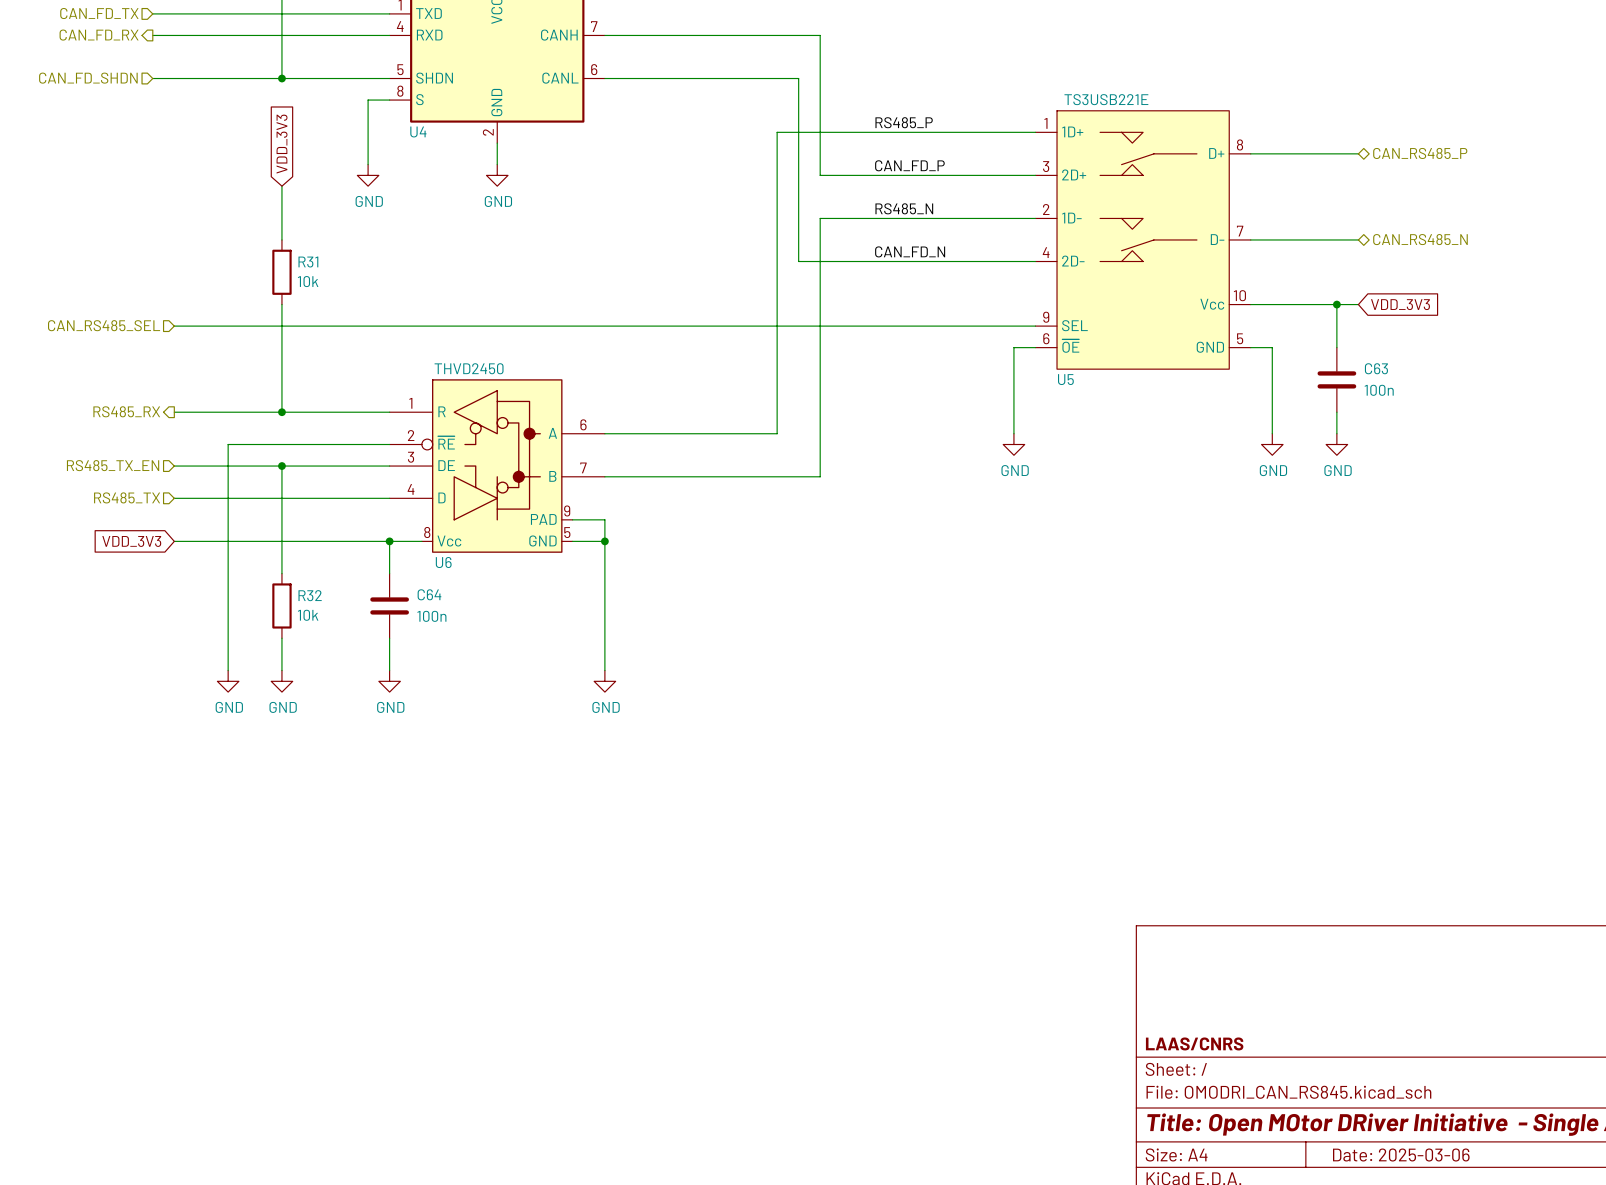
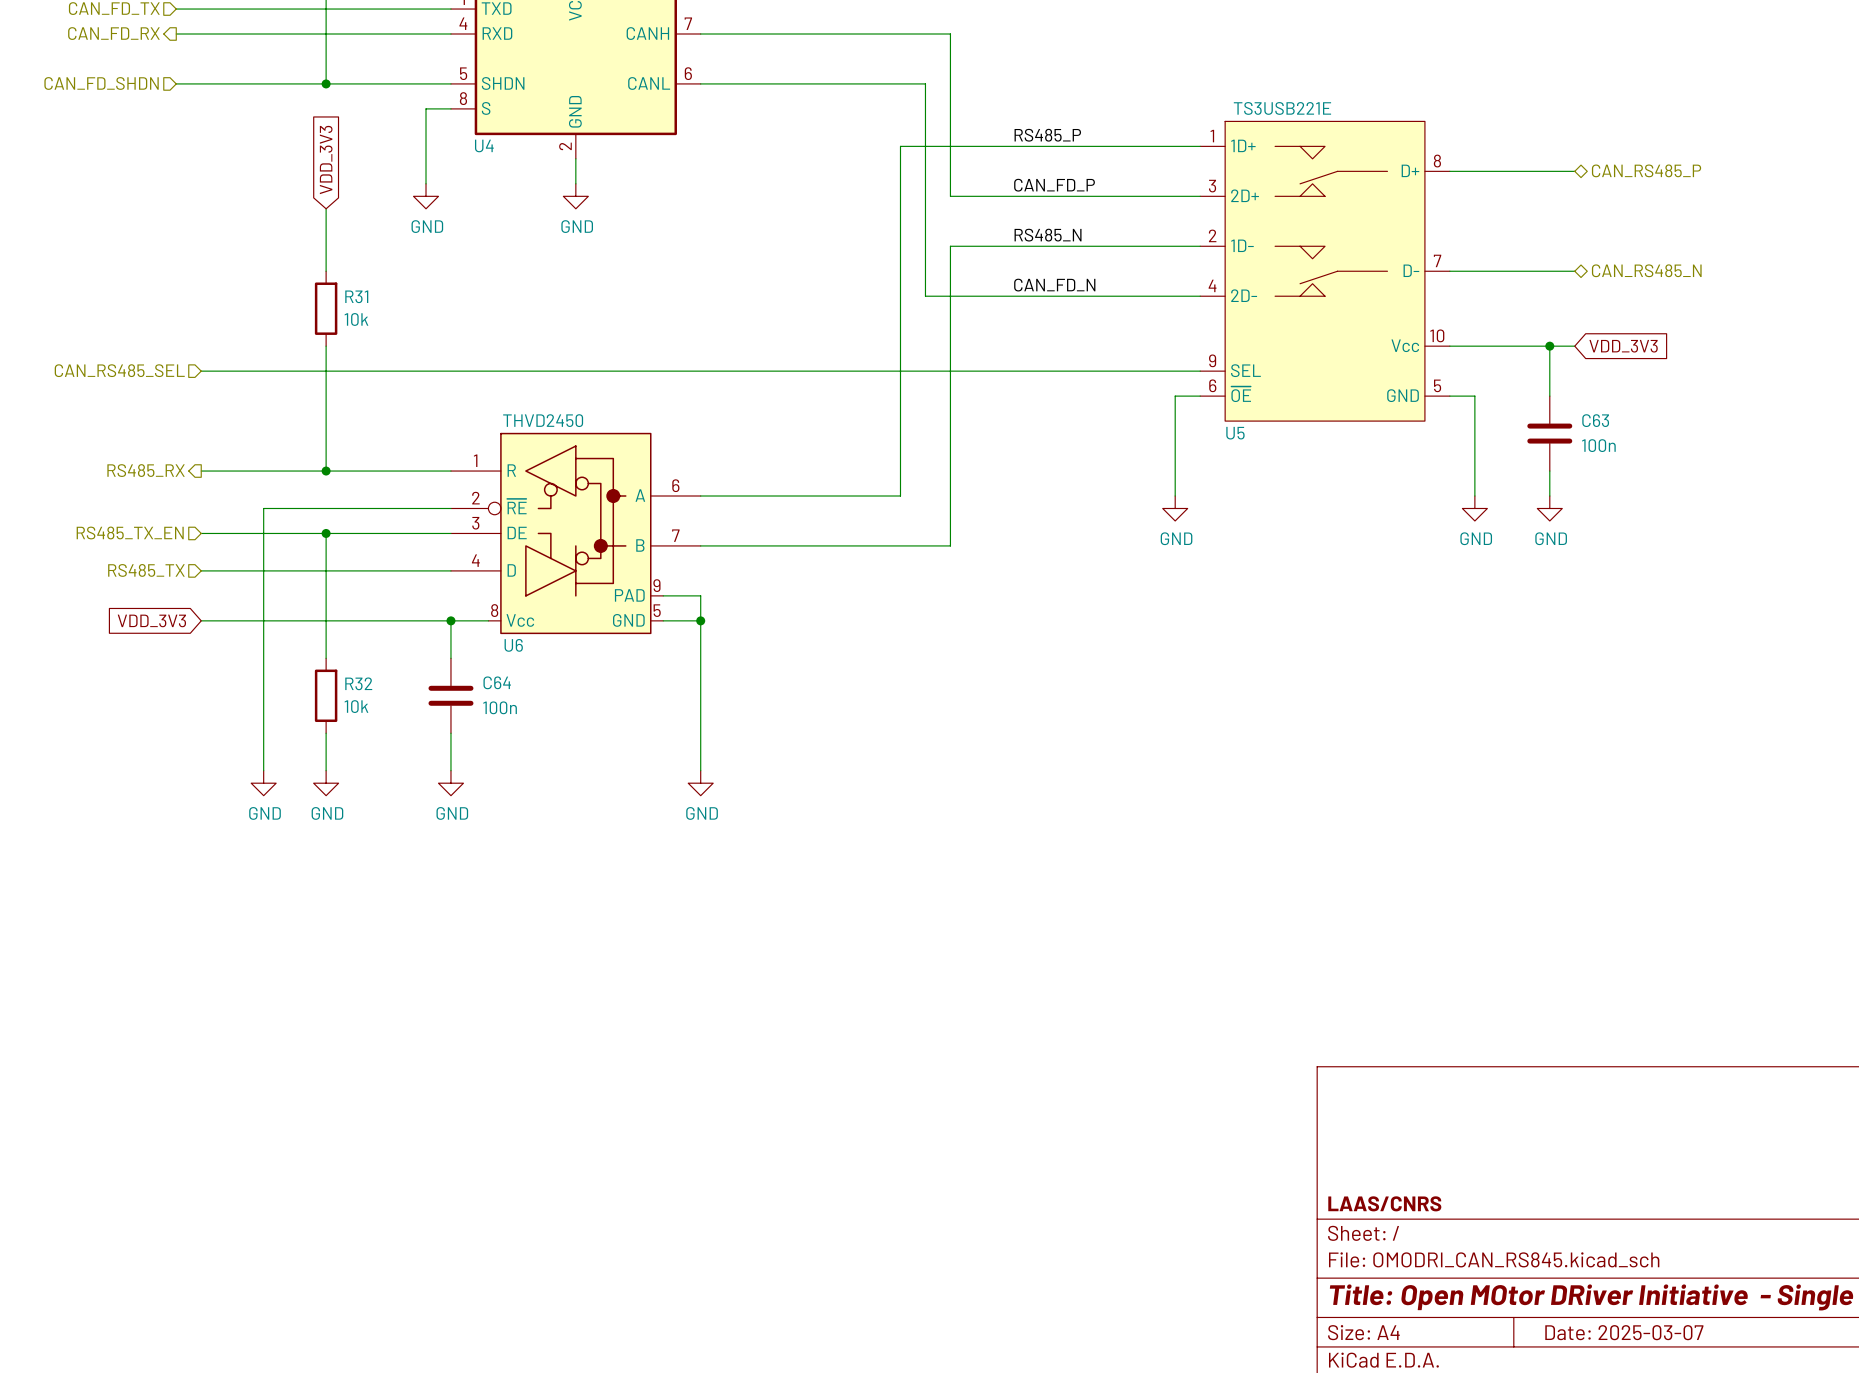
title block: Date: 2025-03-06 (1401, 1155) -> Date: 2025-03-07 (1624, 1332)

